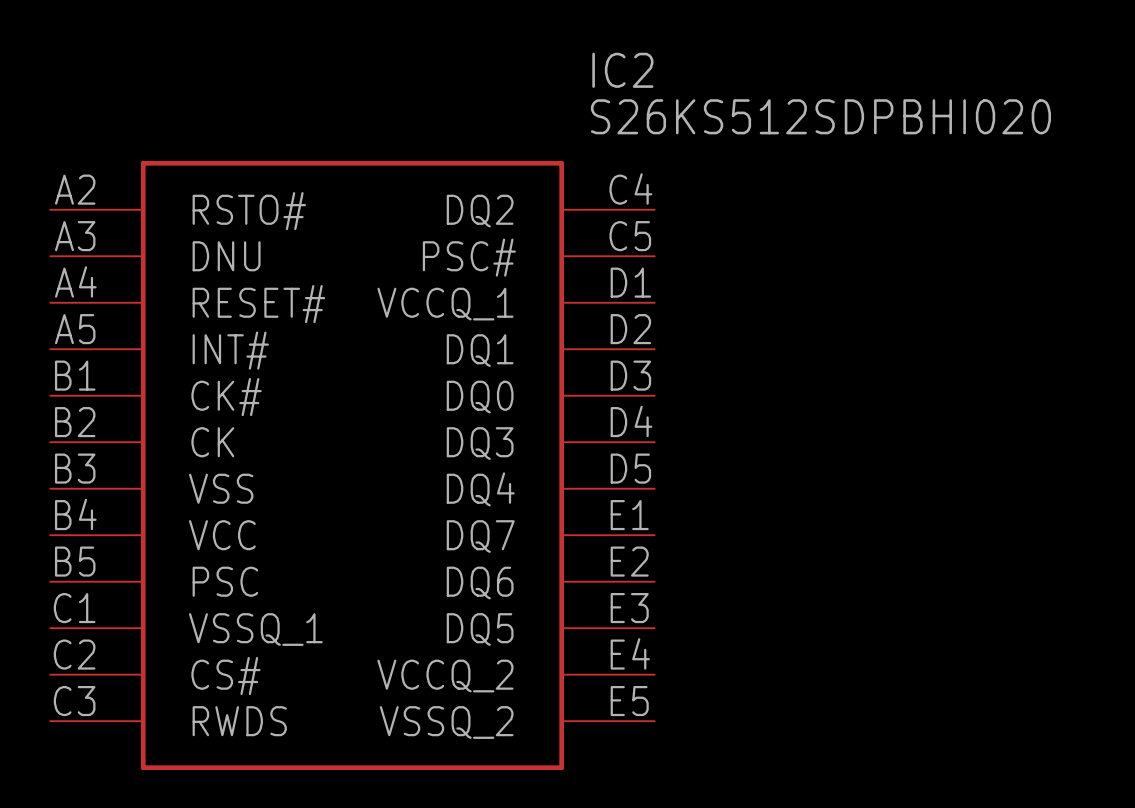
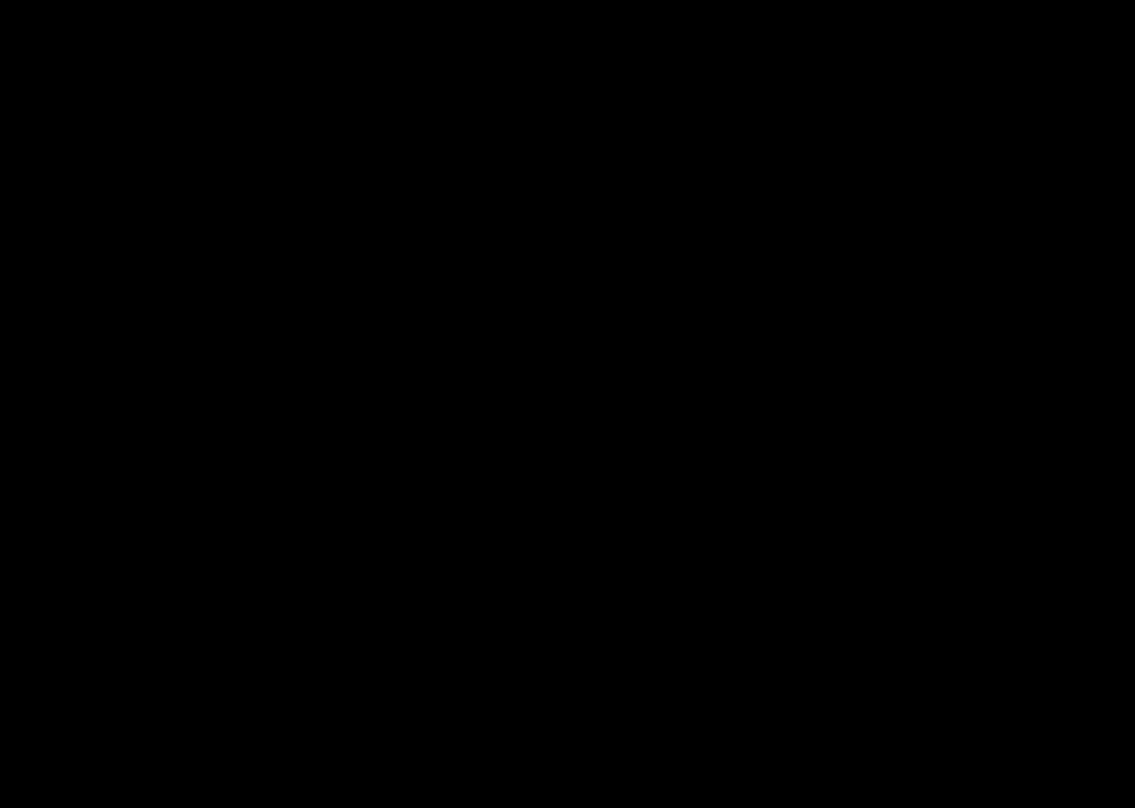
IC2: S26KS512SDPBHI020 (352, 465) -> none

